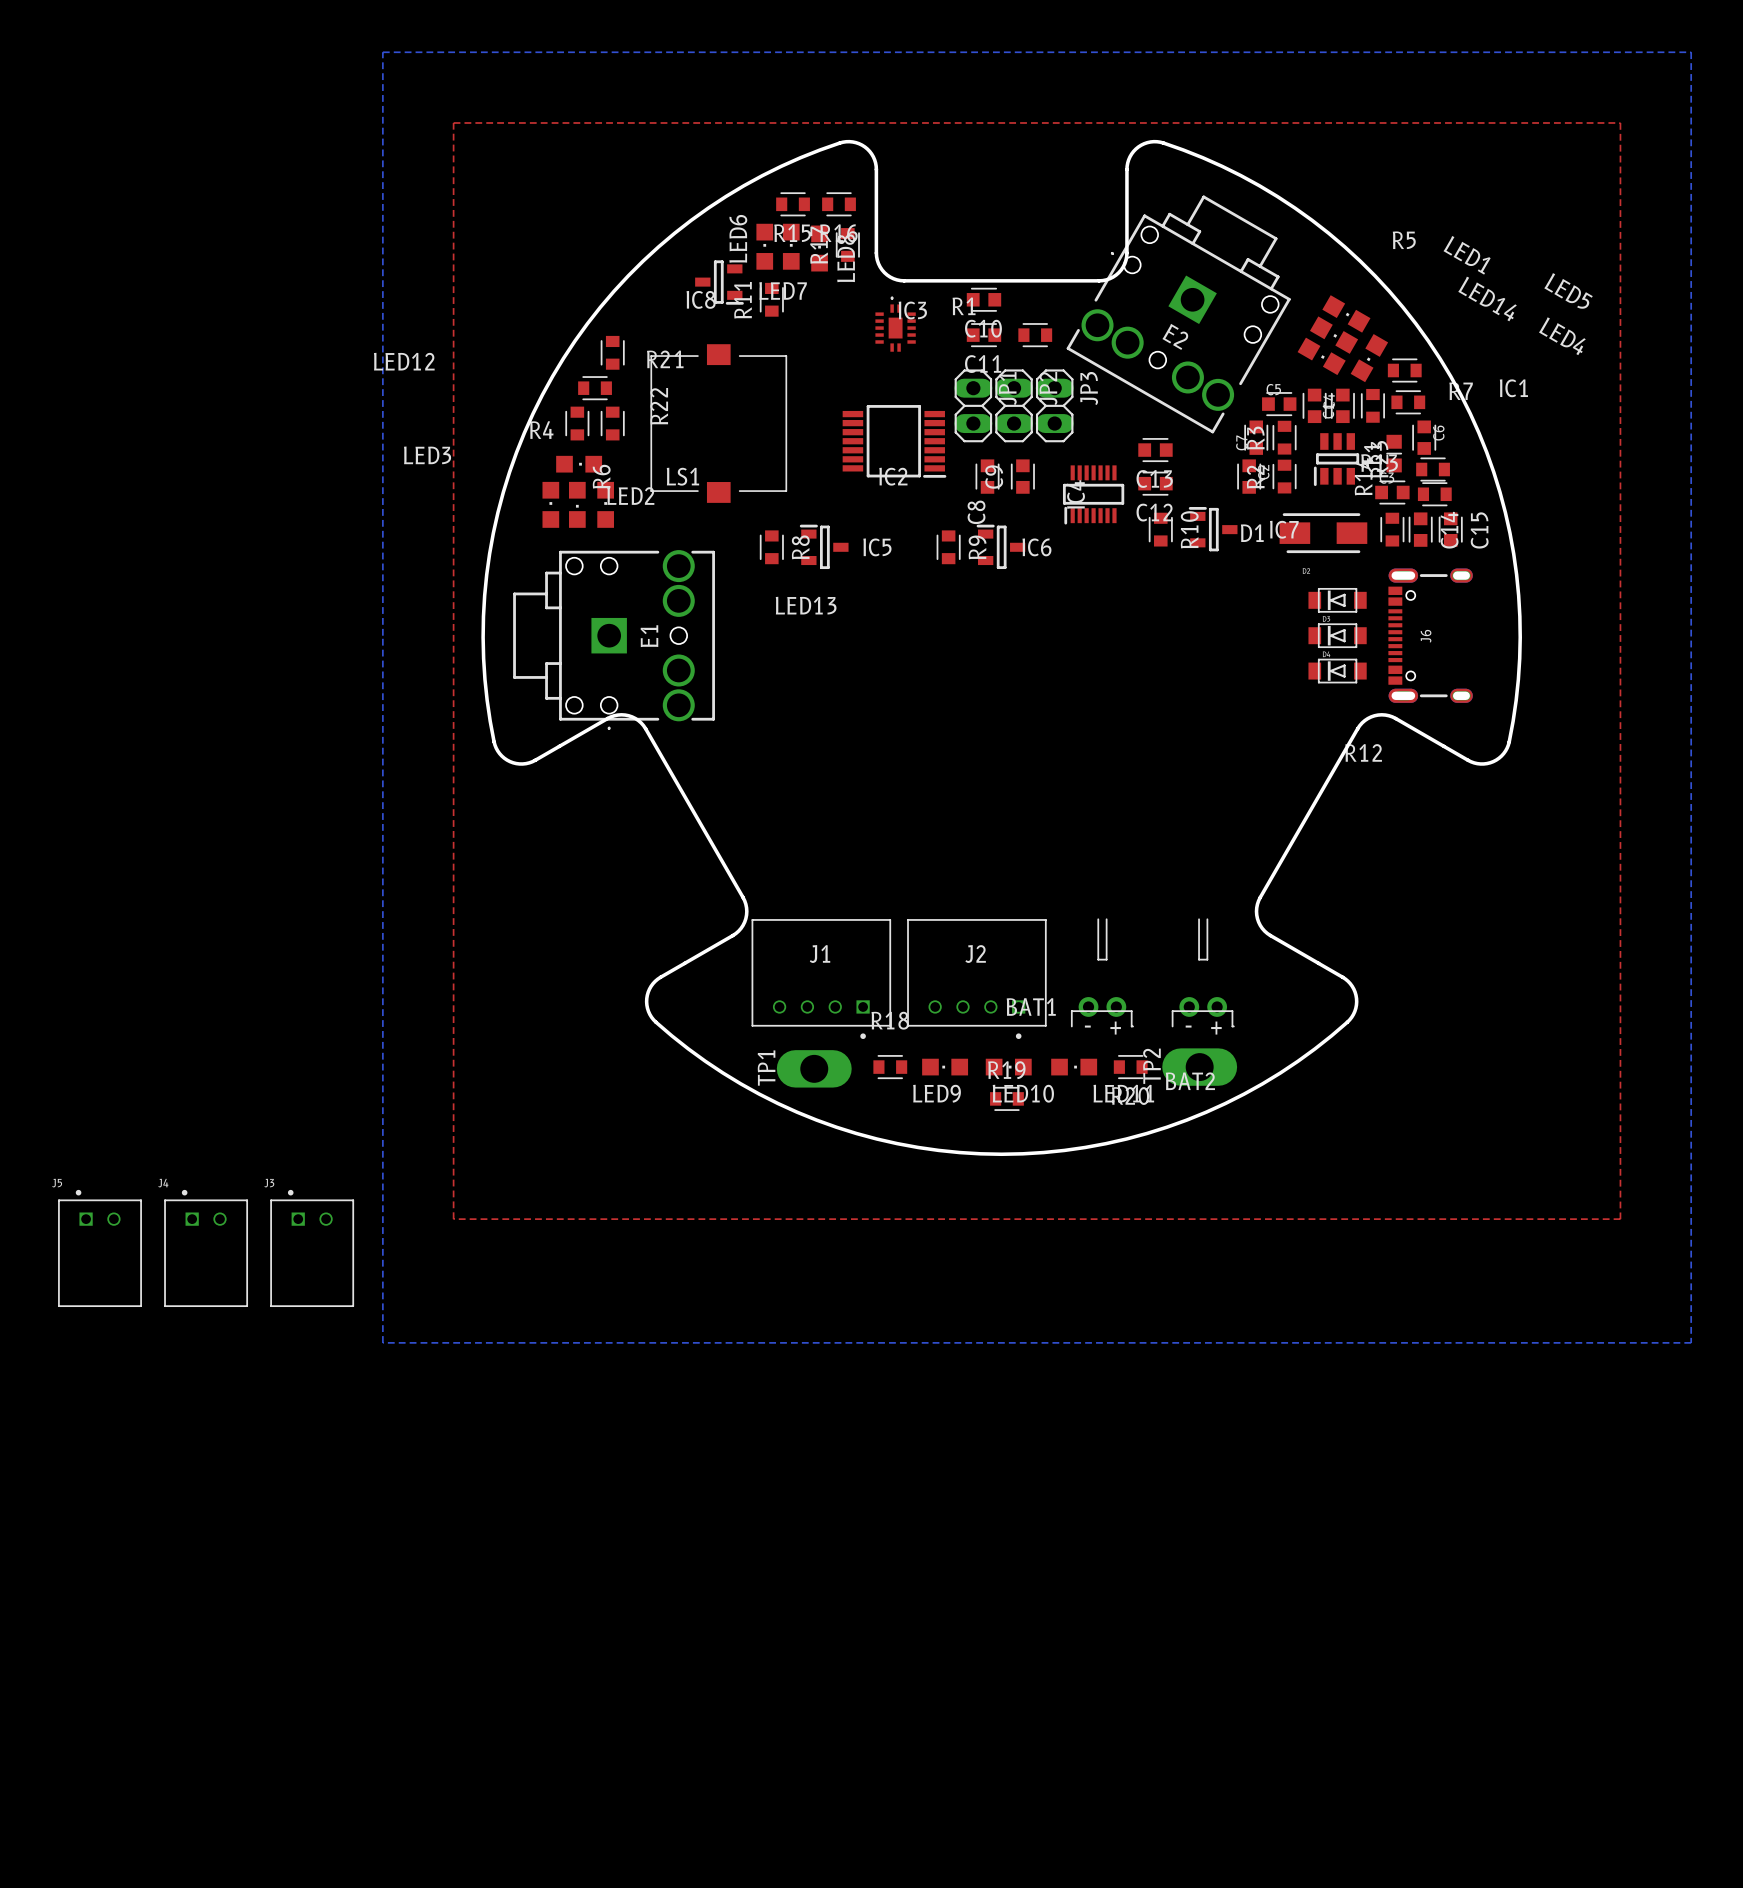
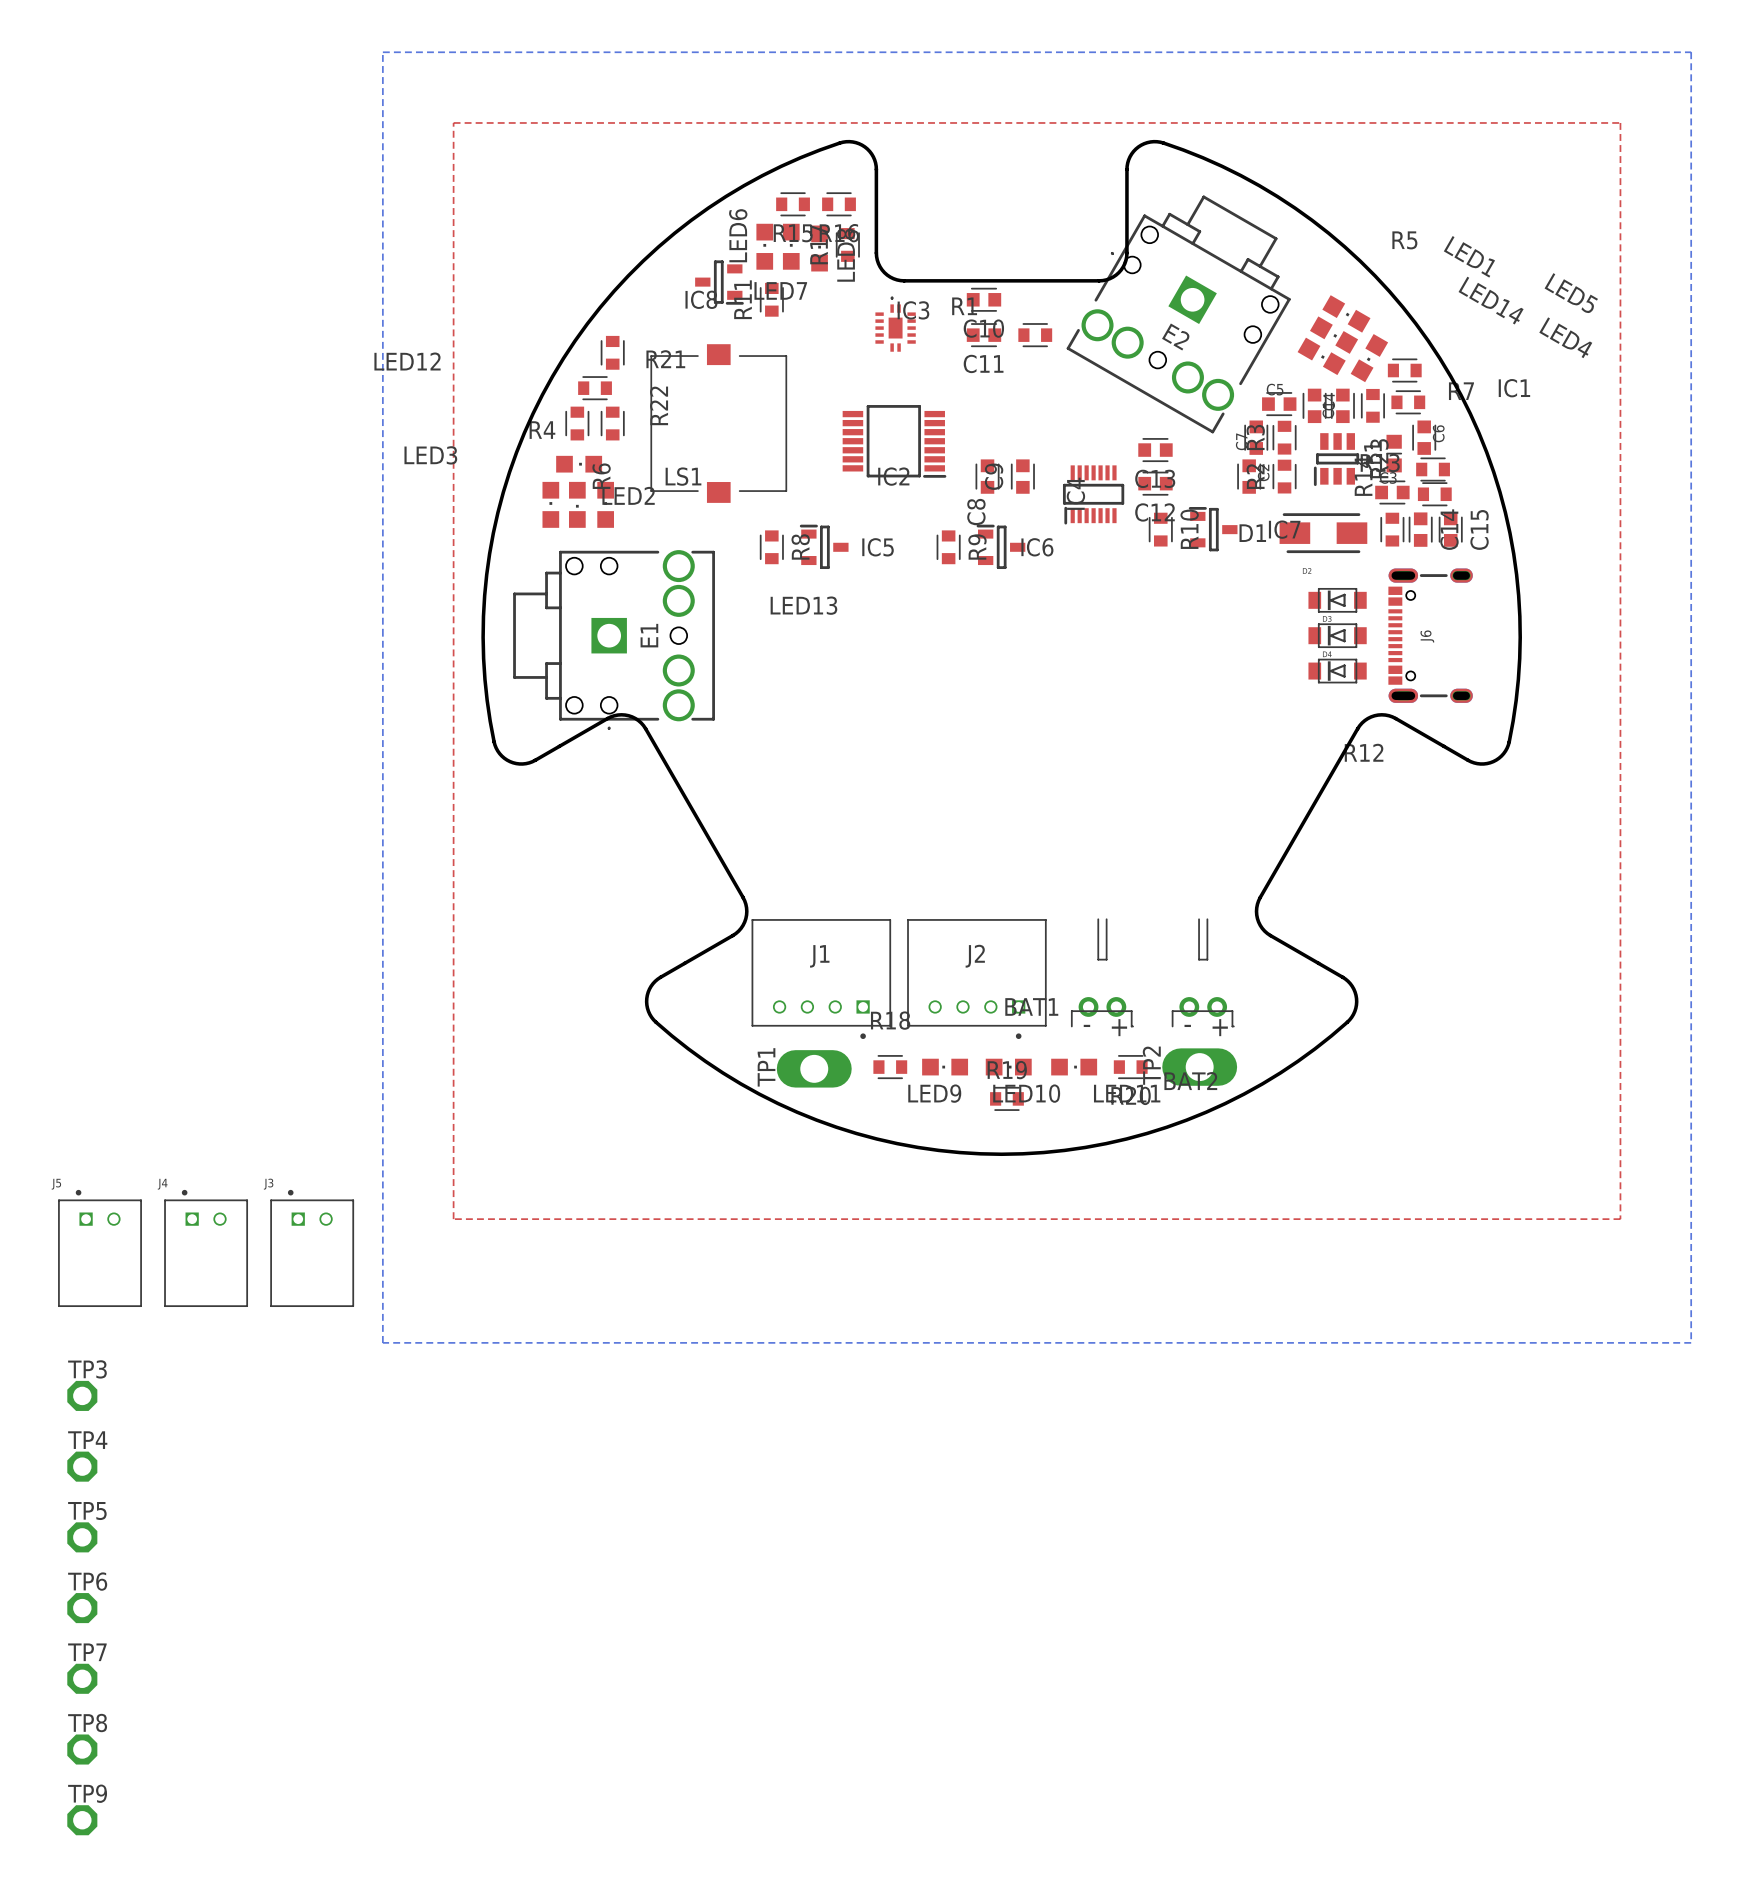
JP1: (973, 405) -> none
JP2: (1014, 405) -> none
JP3: (1054, 405) -> none
TP3: none -> (82, 1395)
TP4: none -> (82, 1466)
TP5: none -> (82, 1537)
TP6: none -> (82, 1608)
TP7: none -> (82, 1678)
TP8: none -> (82, 1749)
TP9: none -> (82, 1820)

